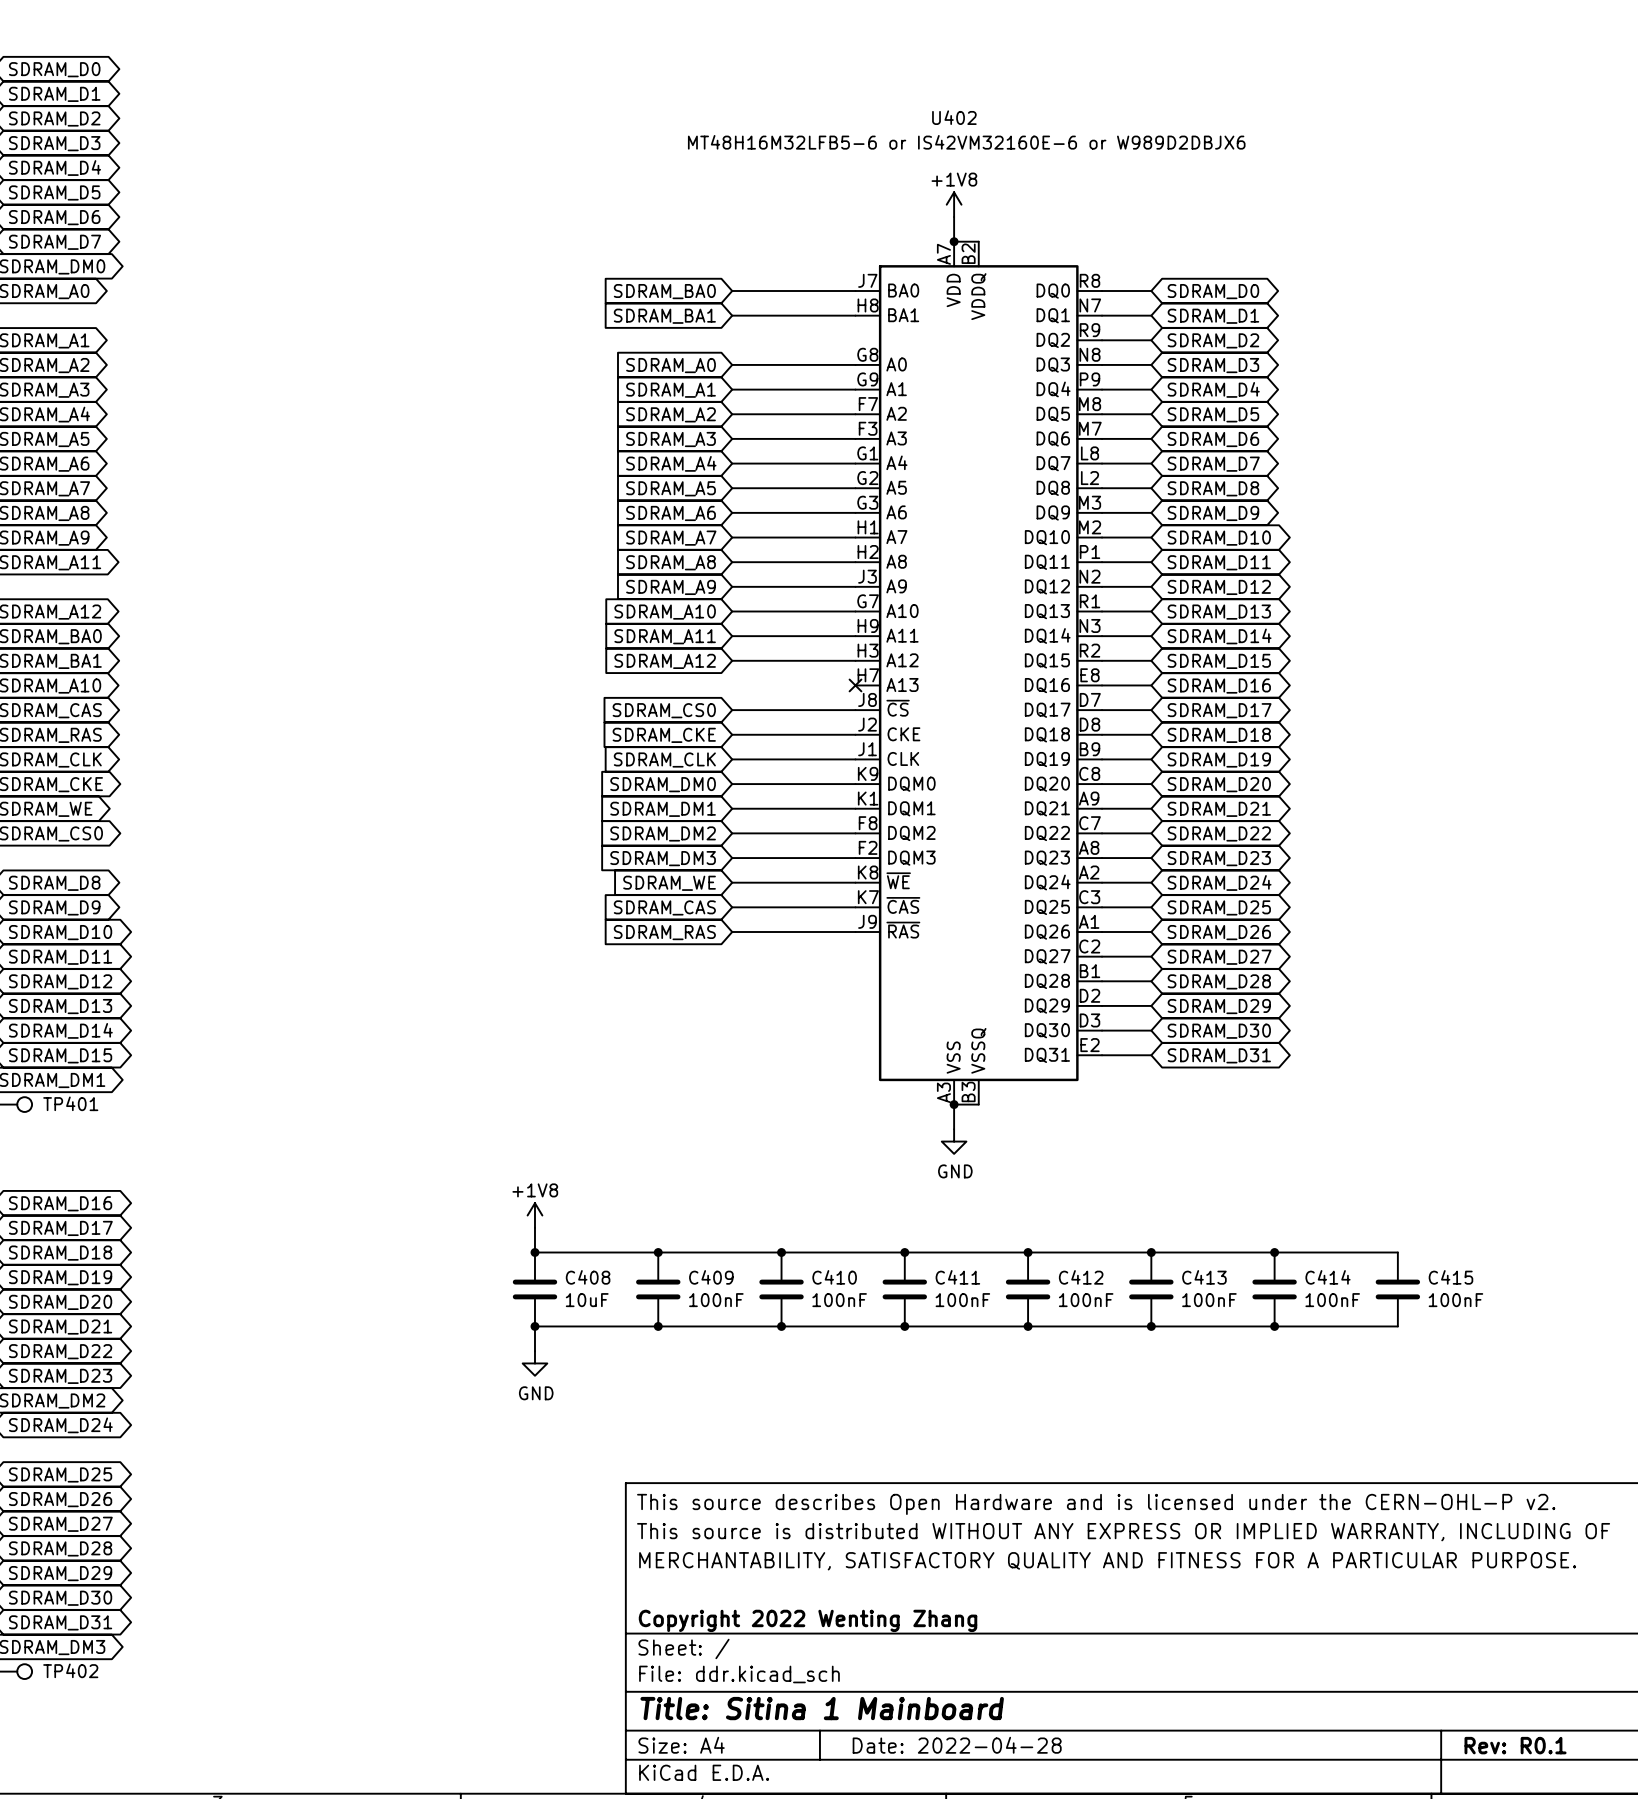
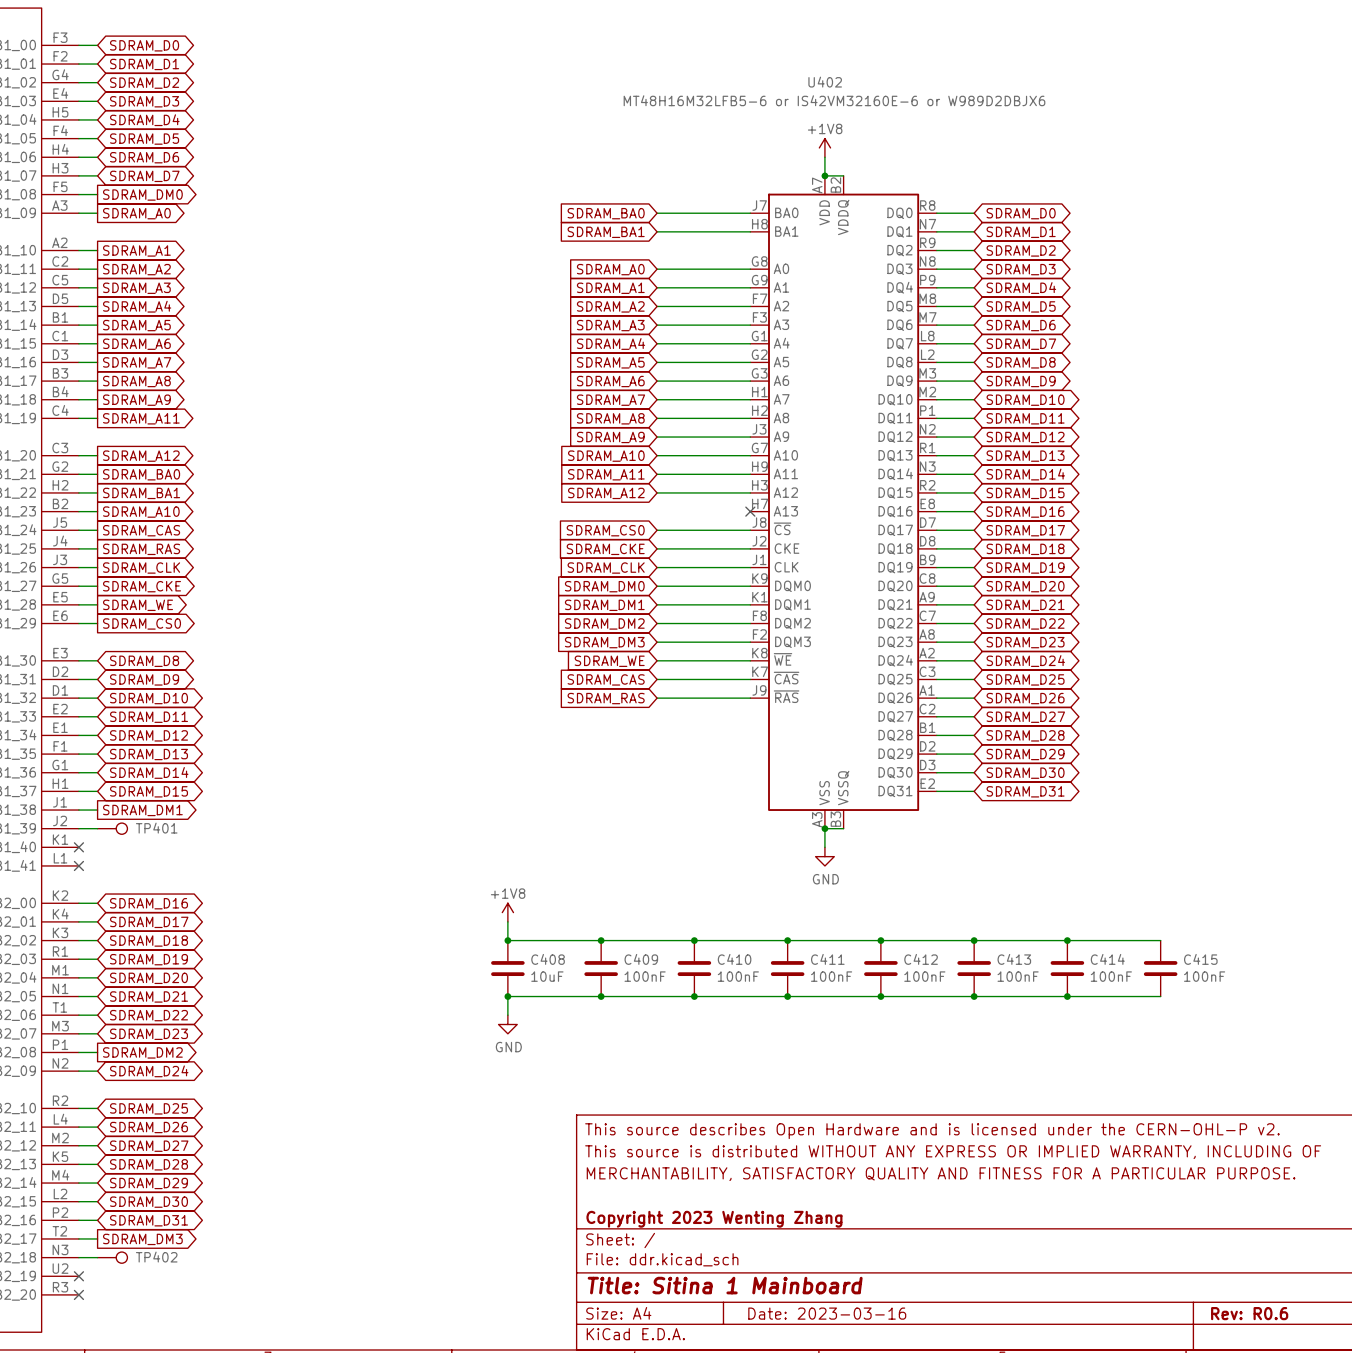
title block: Copyright 2022 Wenting Zhang (808, 1620) -> Copyright 2023 Wenting Zhang (714, 1219)
title block: Date: 2022-04-28 (957, 1745) -> Date: 2023-03-16 (827, 1313)
title block: Rev: R0.1 (1515, 1745) -> Rev: R0.6 (1249, 1313)

